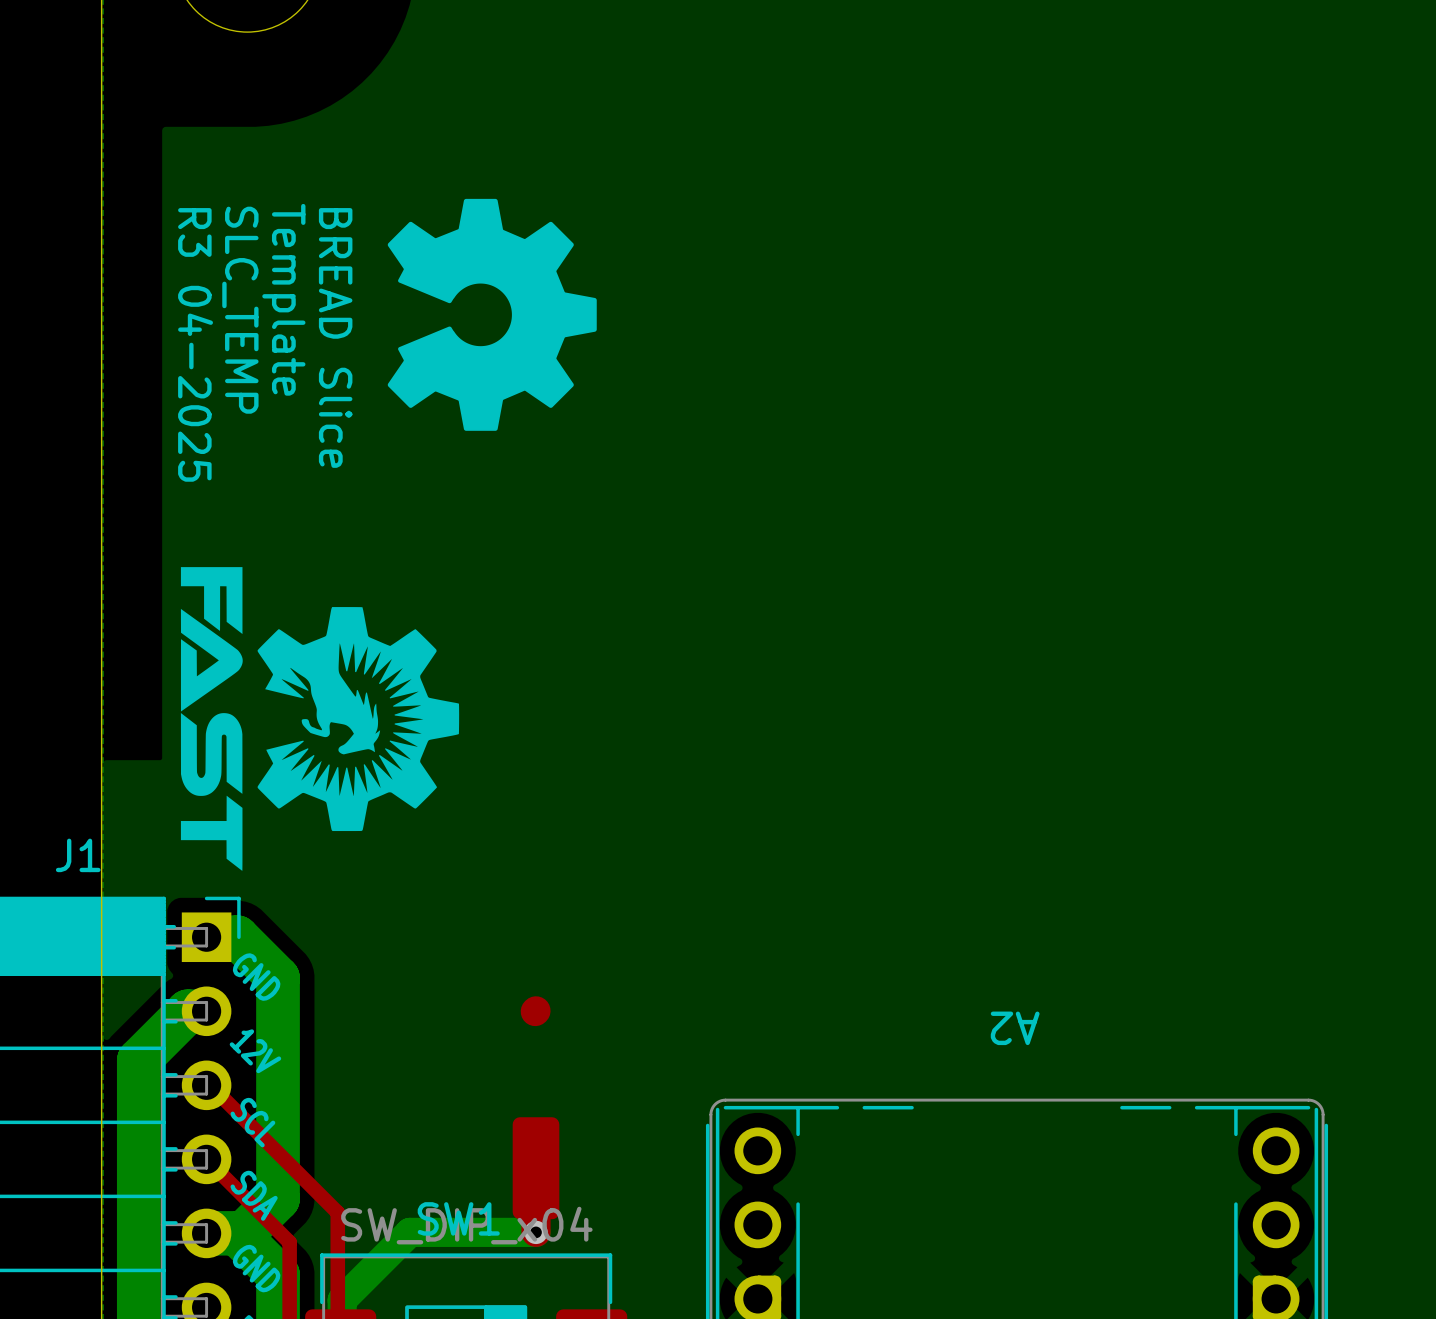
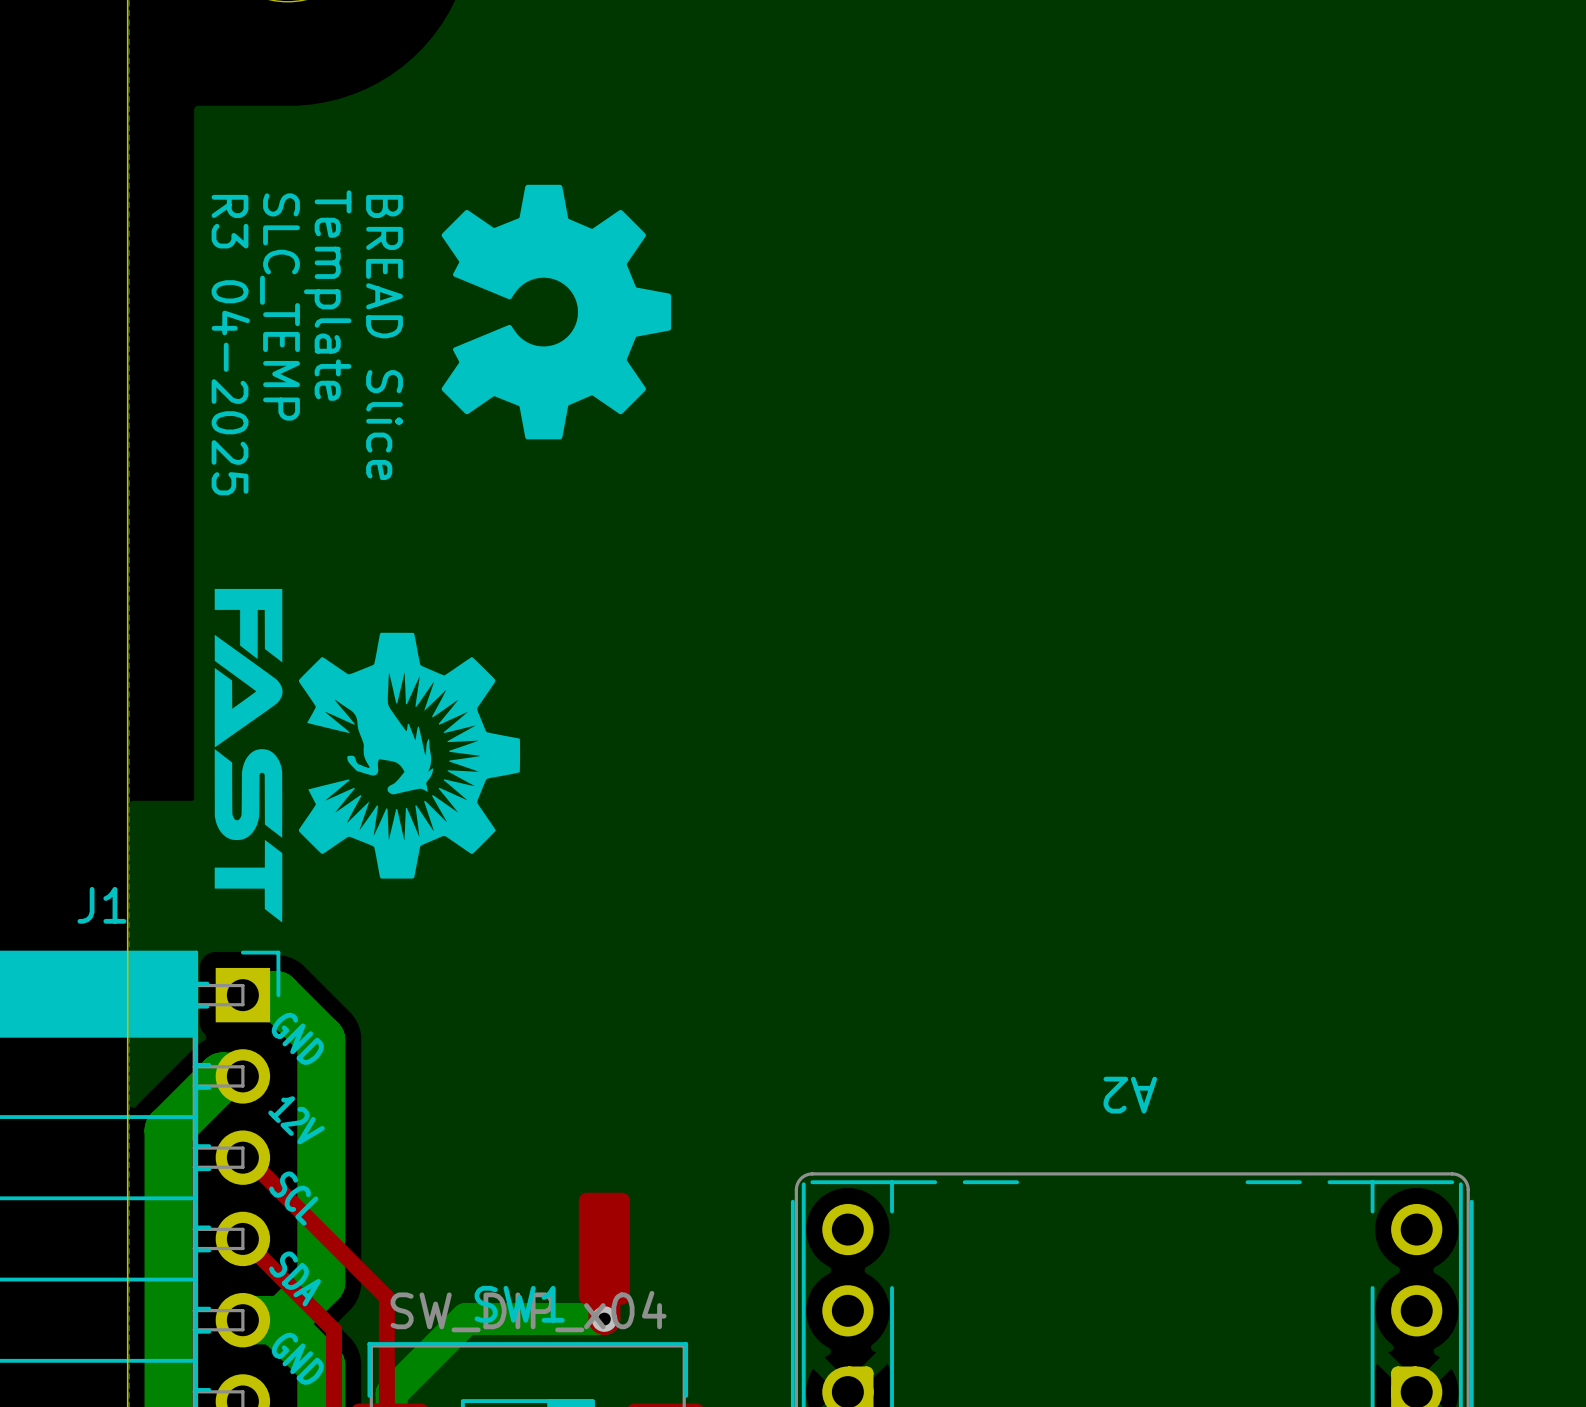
top track: (536, 1010) (535, 1011) -> none

